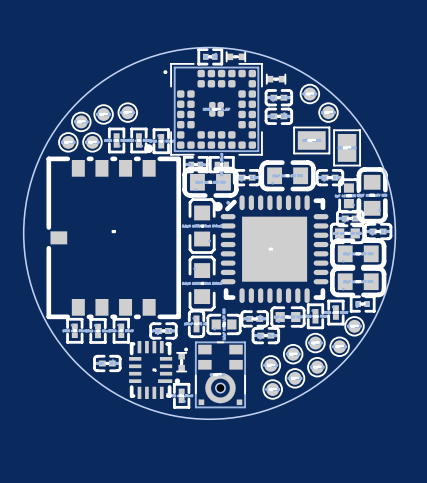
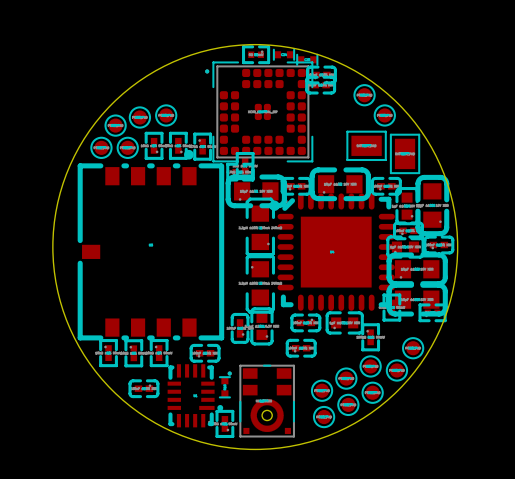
part position: (276, 79) -> (307, 59)
part position: (278, 97) -> (321, 74)
part position: (278, 116) -> (320, 85)
part rotation: 0° (221, 164) -> 90° counterclockwise (245, 166)
part position: (221, 164) -> (245, 166)
part position: (202, 226) -> (260, 227)
part position: (270, 249) -> (332, 252)
part position: (202, 283) -> (260, 283)
part position: (362, 304) -> (432, 312)
part position: (335, 312) -> (391, 307)
part position: (287, 317) -> (344, 322)
part position: (254, 318) -> (305, 322)
part rotation: 0° (196, 323) -> 180° (240, 328)
part rotation: 0° (224, 324) -> 90° counterclockwise (261, 326)
part position: (265, 335) -> (301, 348)

